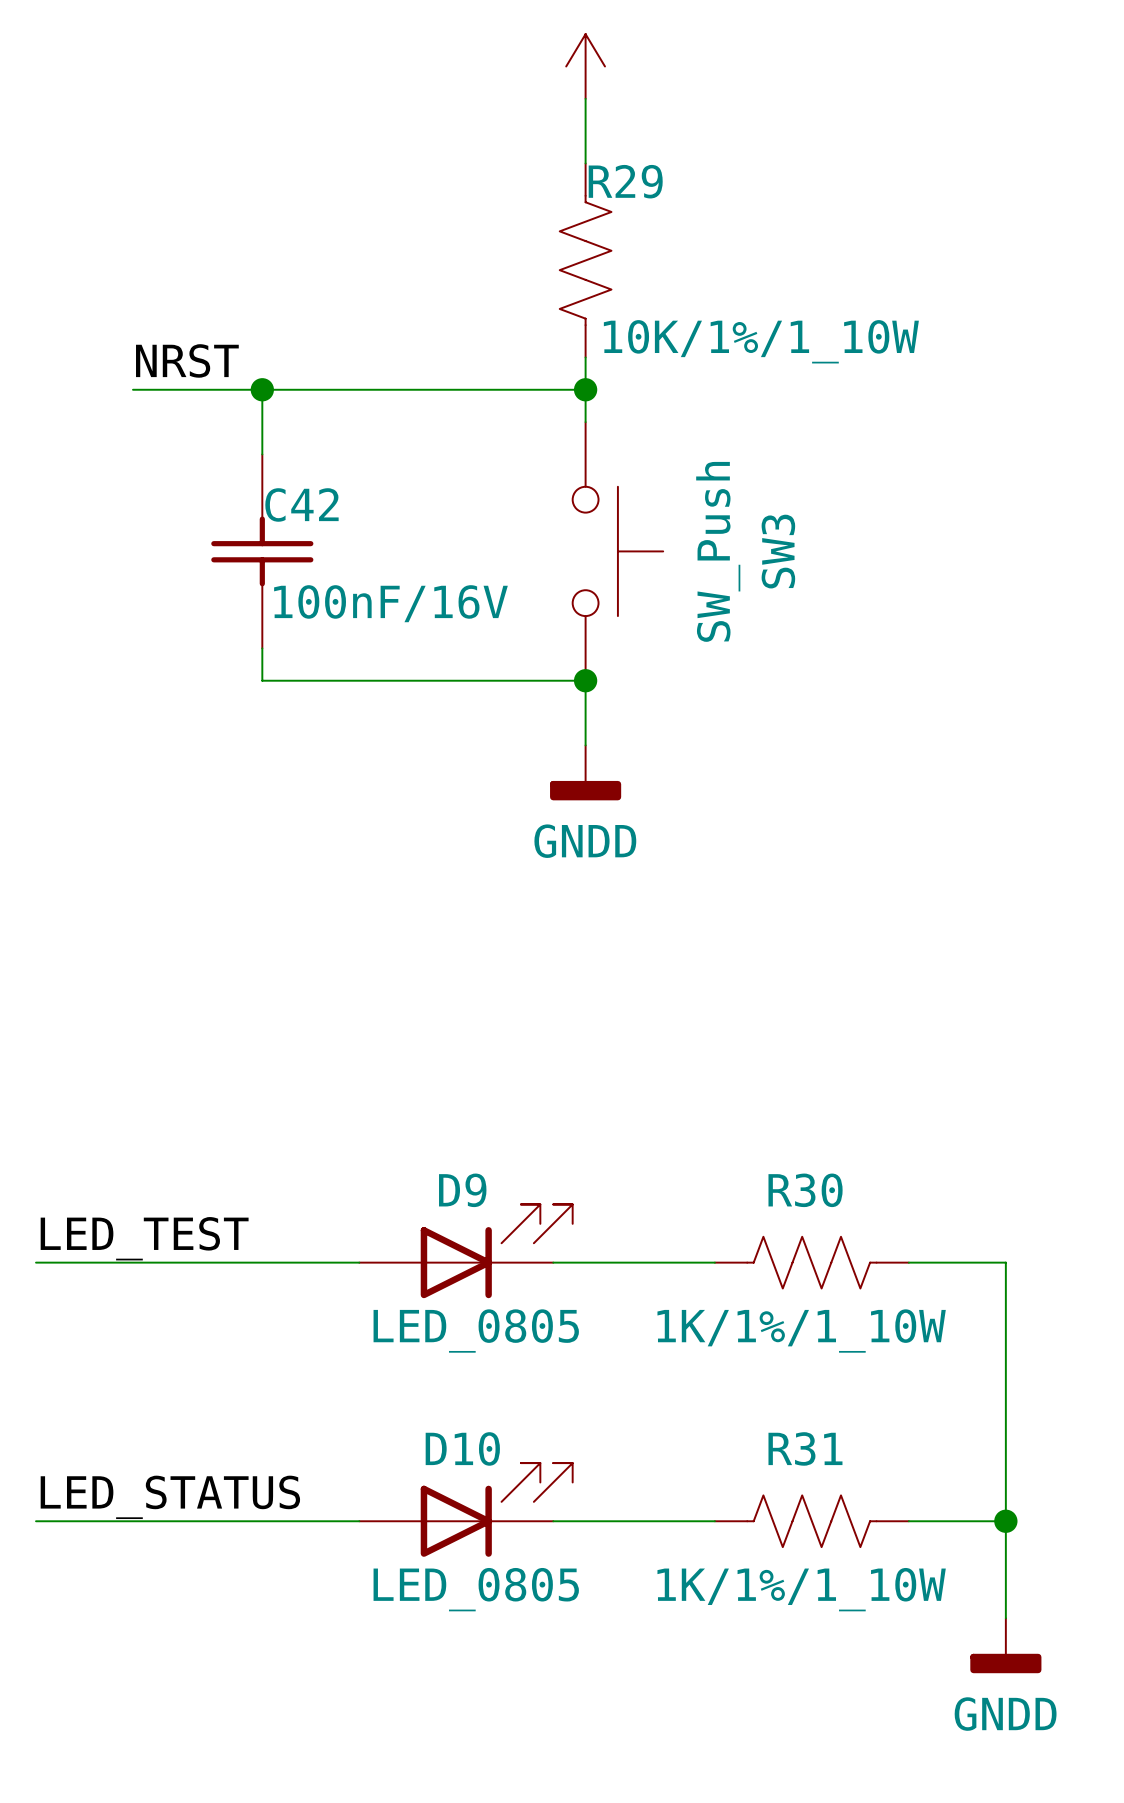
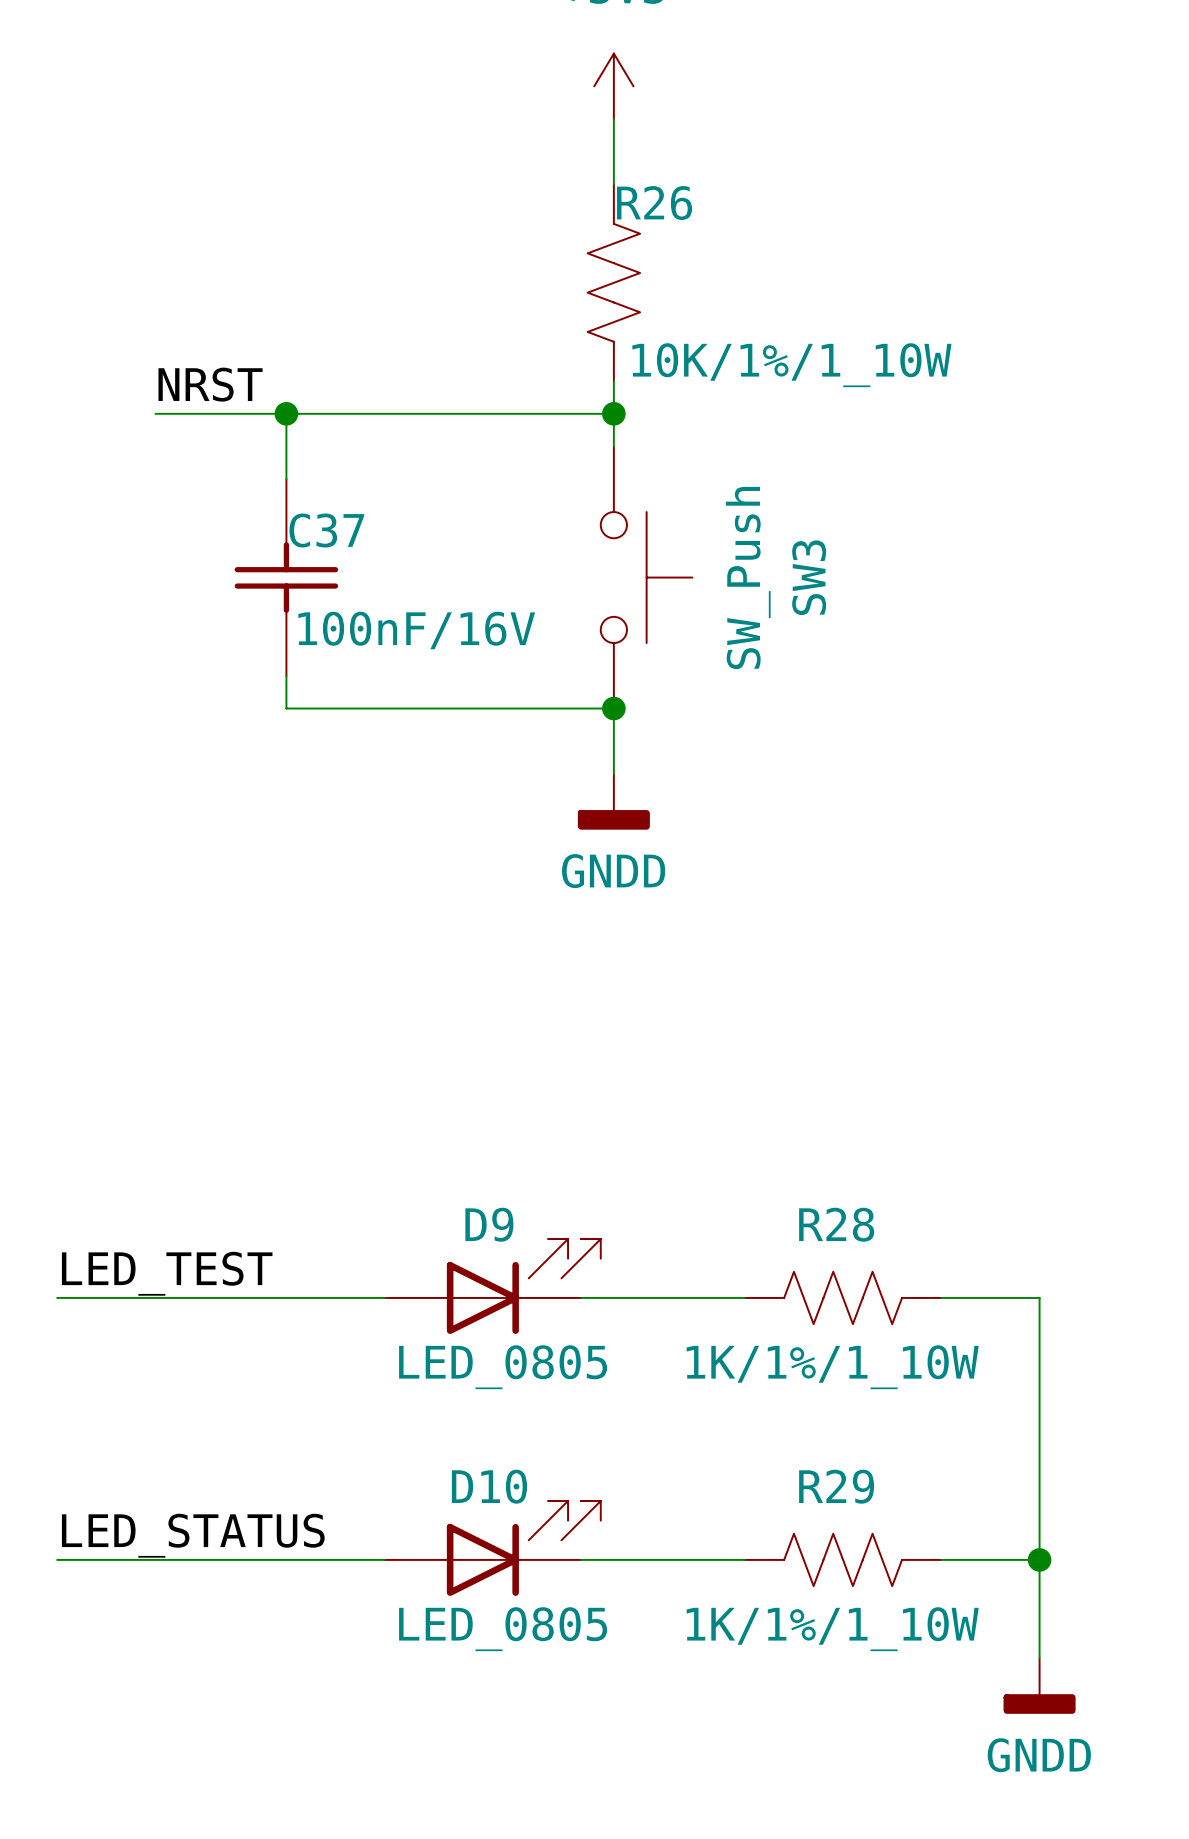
R29 name: R29 (625, 181) -> R26 (654, 203)
C42 name: C42 (301, 504) -> C37 (326, 530)
R30 name: R30 (805, 1190) -> R28 (836, 1224)
R31 name: R31 (805, 1448) -> R29 (836, 1486)

